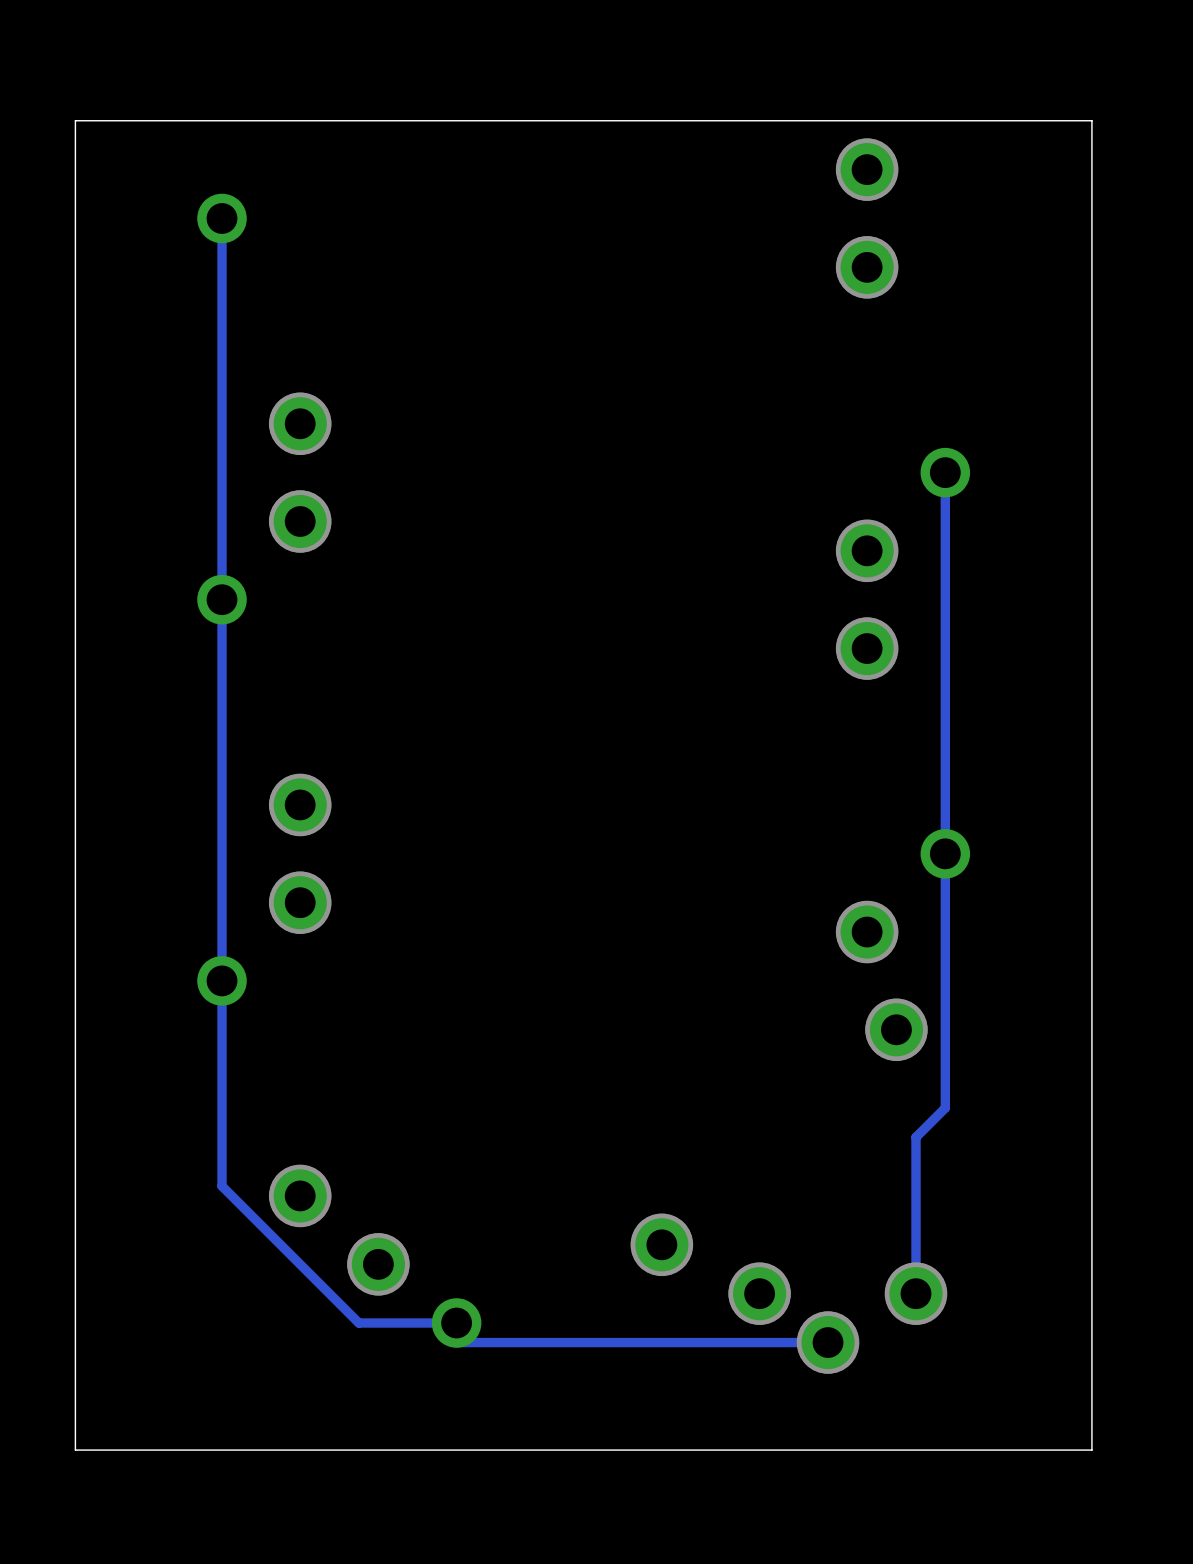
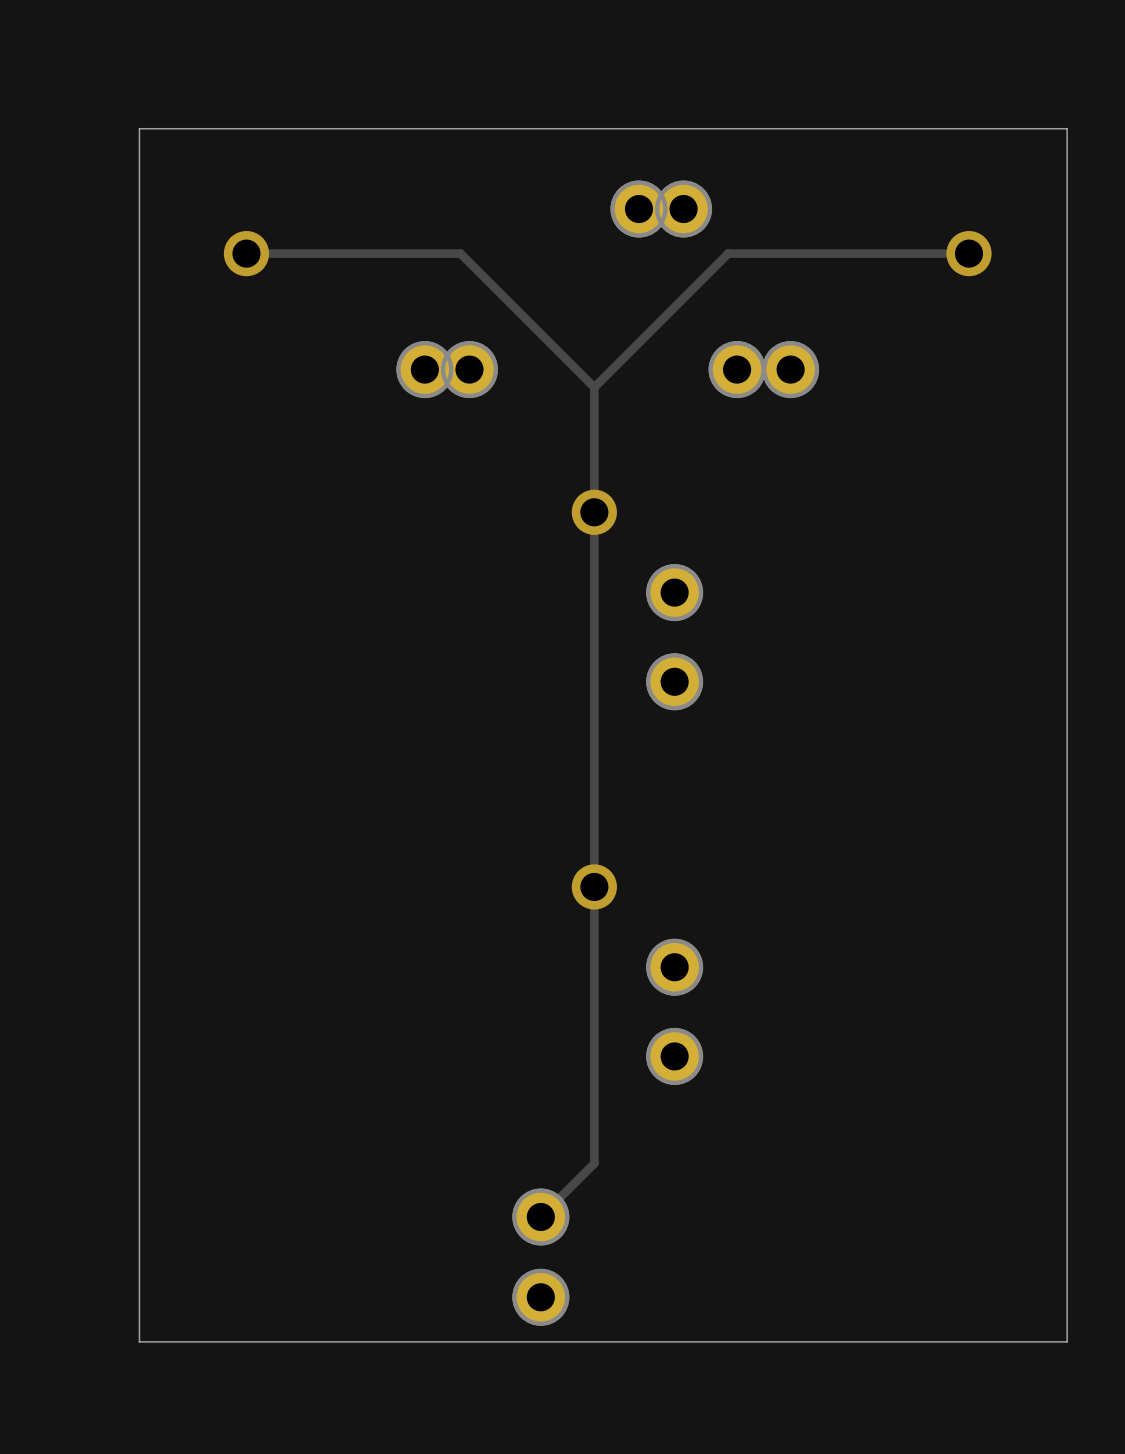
part: (867, 169) -> none
part: none -> (638, 209)
part: none -> (683, 209)
track: (222, 218) (222, 1186) (358, 1323) (456, 1323) (456, 1342) (828, 1342) -> none
via position: (222, 218) -> (246, 253)
track: none -> (246, 253) (460, 253) (594, 387)
track: none -> (969, 253) (728, 253) (594, 387)
via: none -> (969, 253)
part: (867, 267) -> none
part: none -> (424, 369)
part: none -> (469, 369)
part: none -> (737, 369)
part: none -> (790, 369)
track: none -> (594, 387) (594, 1163) (540, 1217)
part: (300, 423) -> none
track: (945, 472) (945, 1107) (916, 1137) (916, 1293) -> none
via: (945, 472) -> none
part: (300, 521) -> none
via: none -> (594, 512)
part: (867, 550) -> none
via: (222, 599) -> none
part: none -> (674, 592)
part: (867, 648) -> none
part: none -> (674, 681)
part: (300, 804) -> none
via: (945, 853) -> none
part: (300, 902) -> none
part: (867, 932) -> none
via: none -> (594, 886)
via: (222, 980) -> none
part: (896, 1029) -> none
part: none -> (674, 967)
part: none -> (674, 1056)
part: (300, 1195) -> none
part: (661, 1244) -> none
part: (378, 1264) -> none
part: (759, 1293) -> none
part: (916, 1293) -> none
part: none -> (540, 1217)
via: (456, 1323) -> none
part: (828, 1342) -> none
part: none -> (540, 1297)

